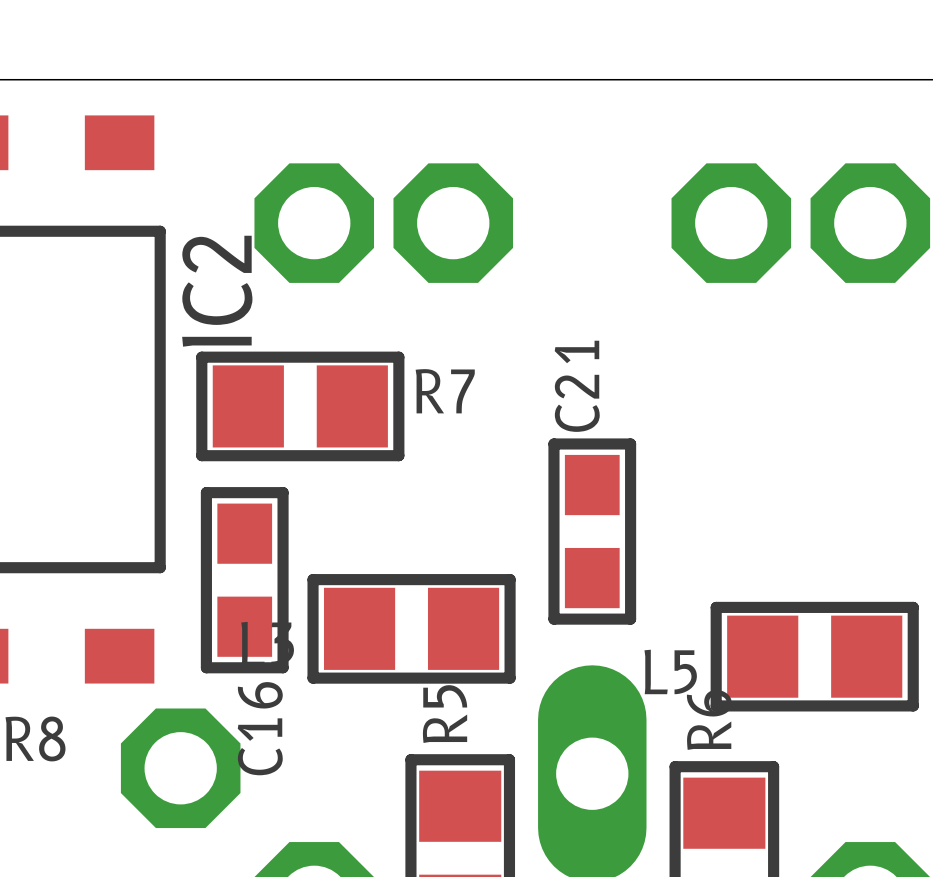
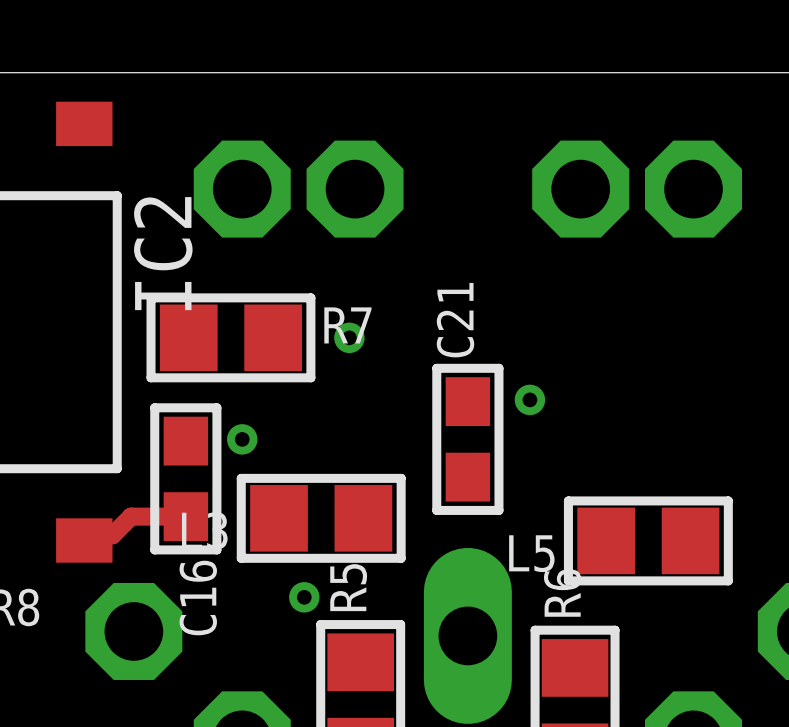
via: none -> (349, 337)
via: none -> (529, 399)
via: none -> (242, 439)
top track: none -> (185, 516) (131, 516) (112, 535) (89, 535) (84, 540)
via: none -> (304, 597)

